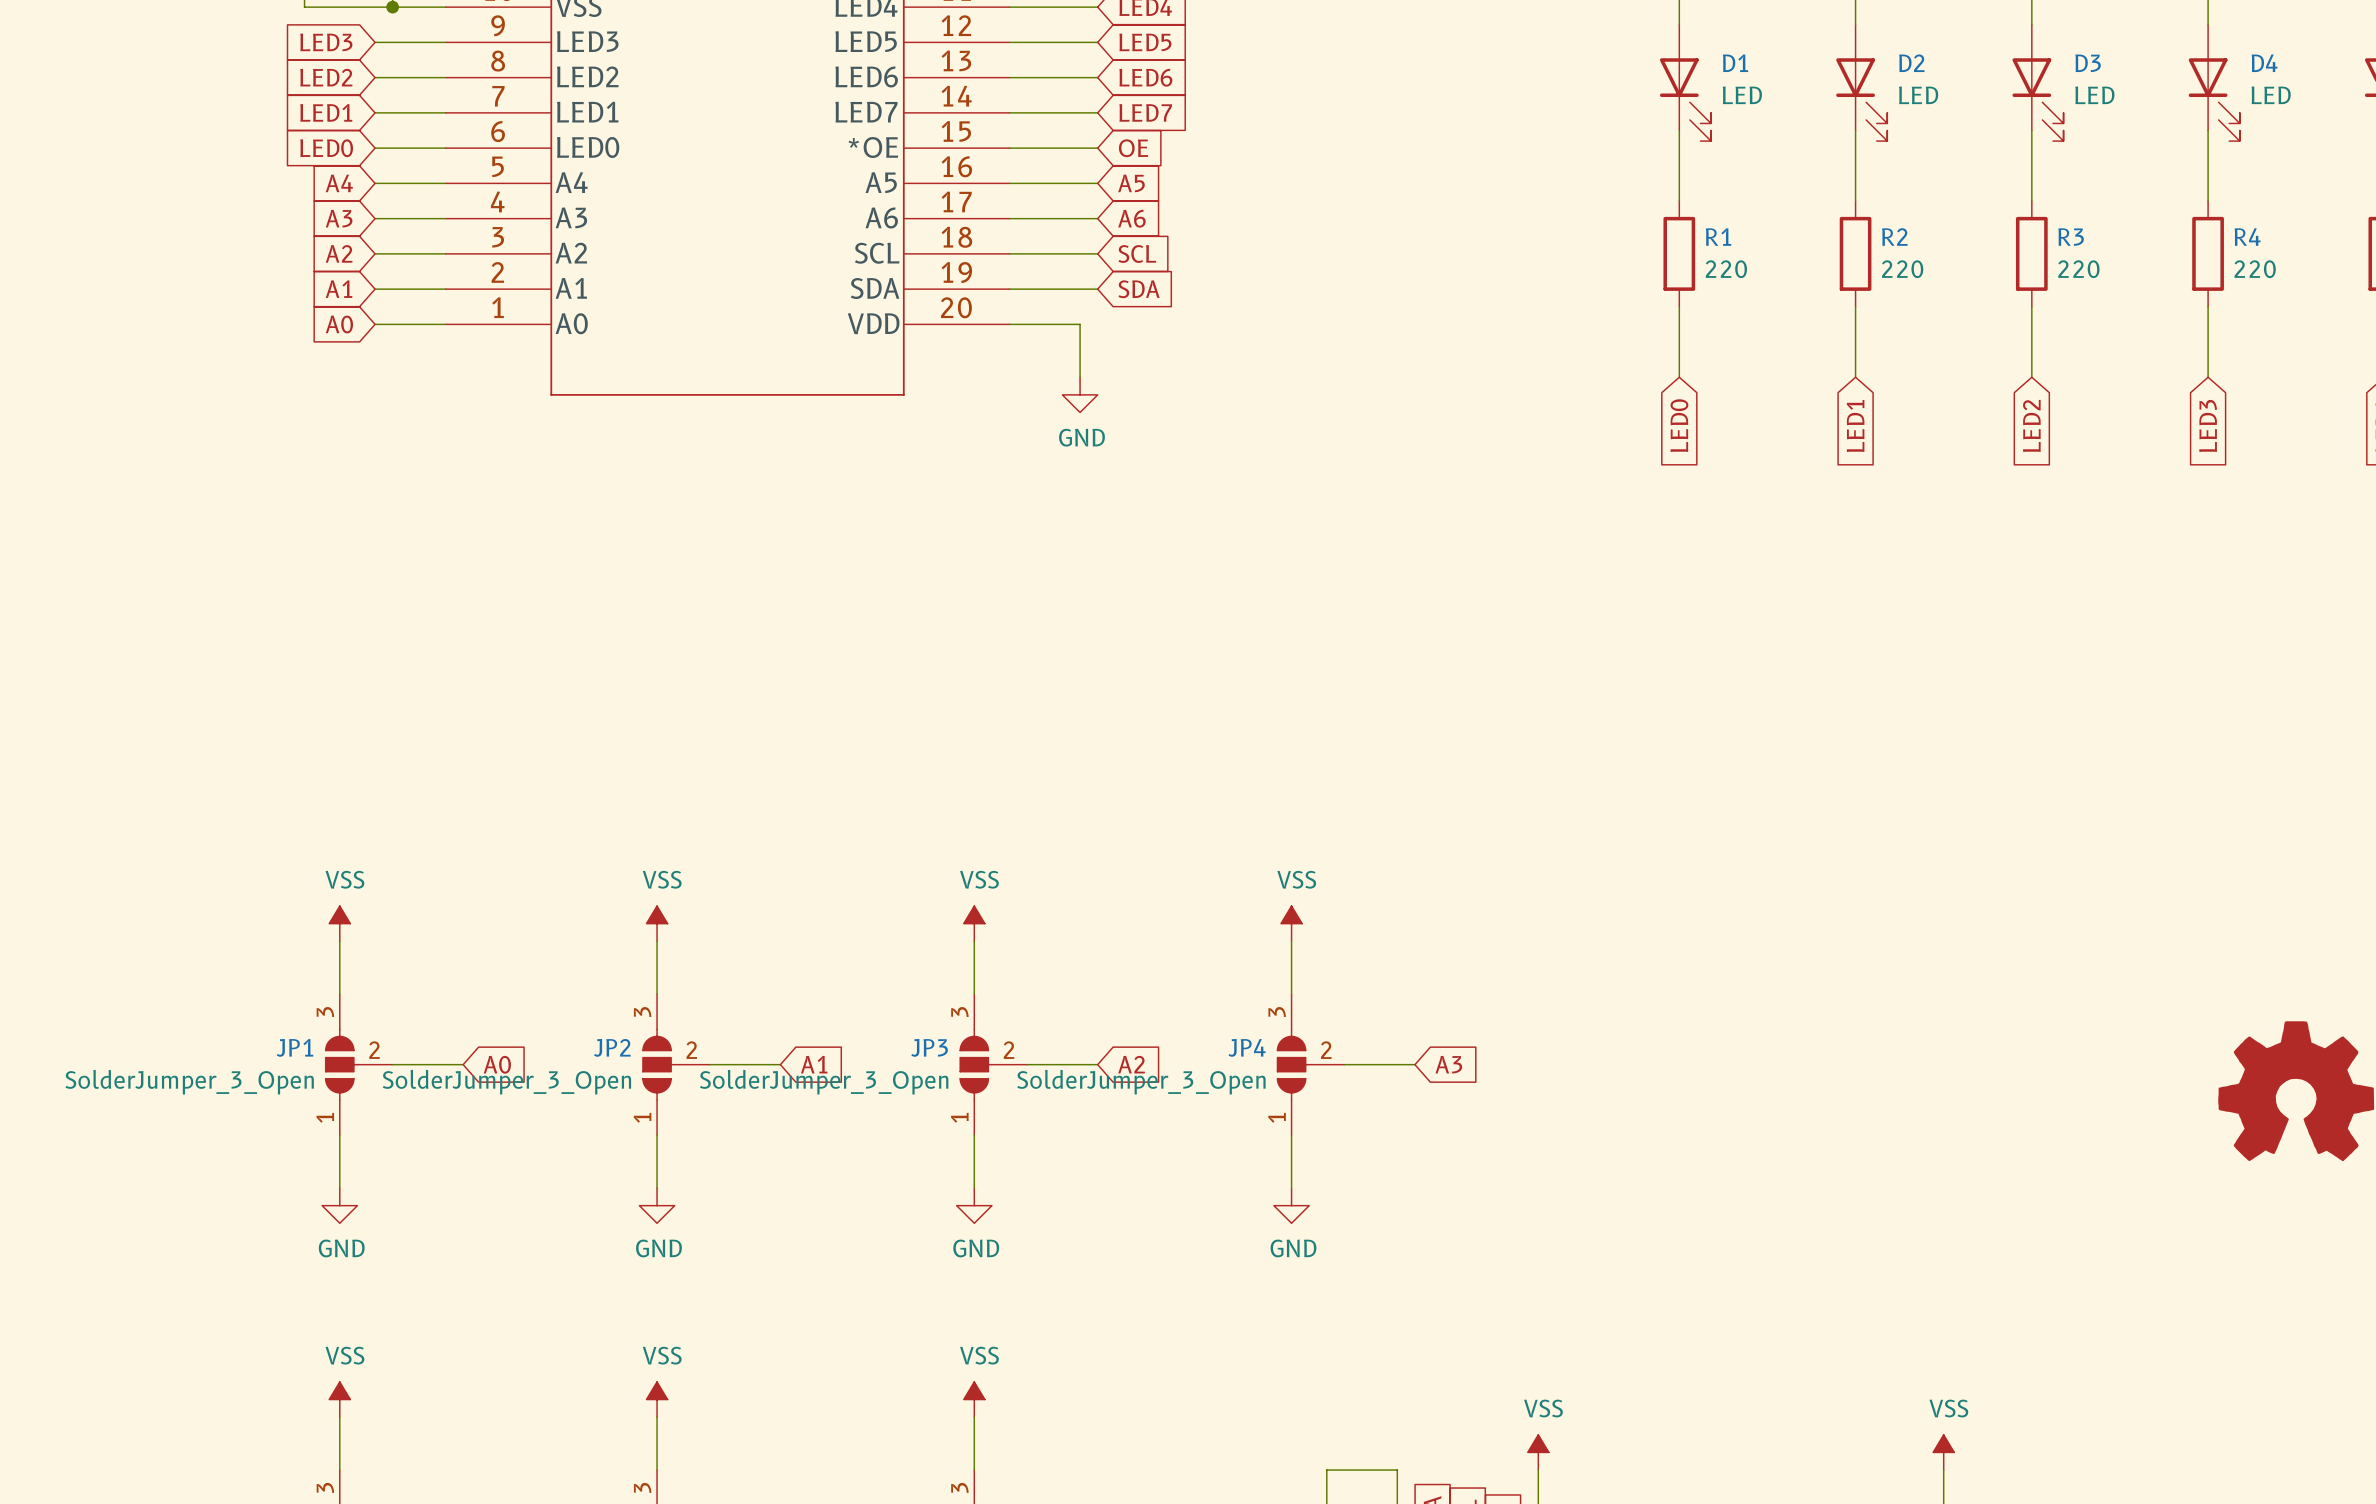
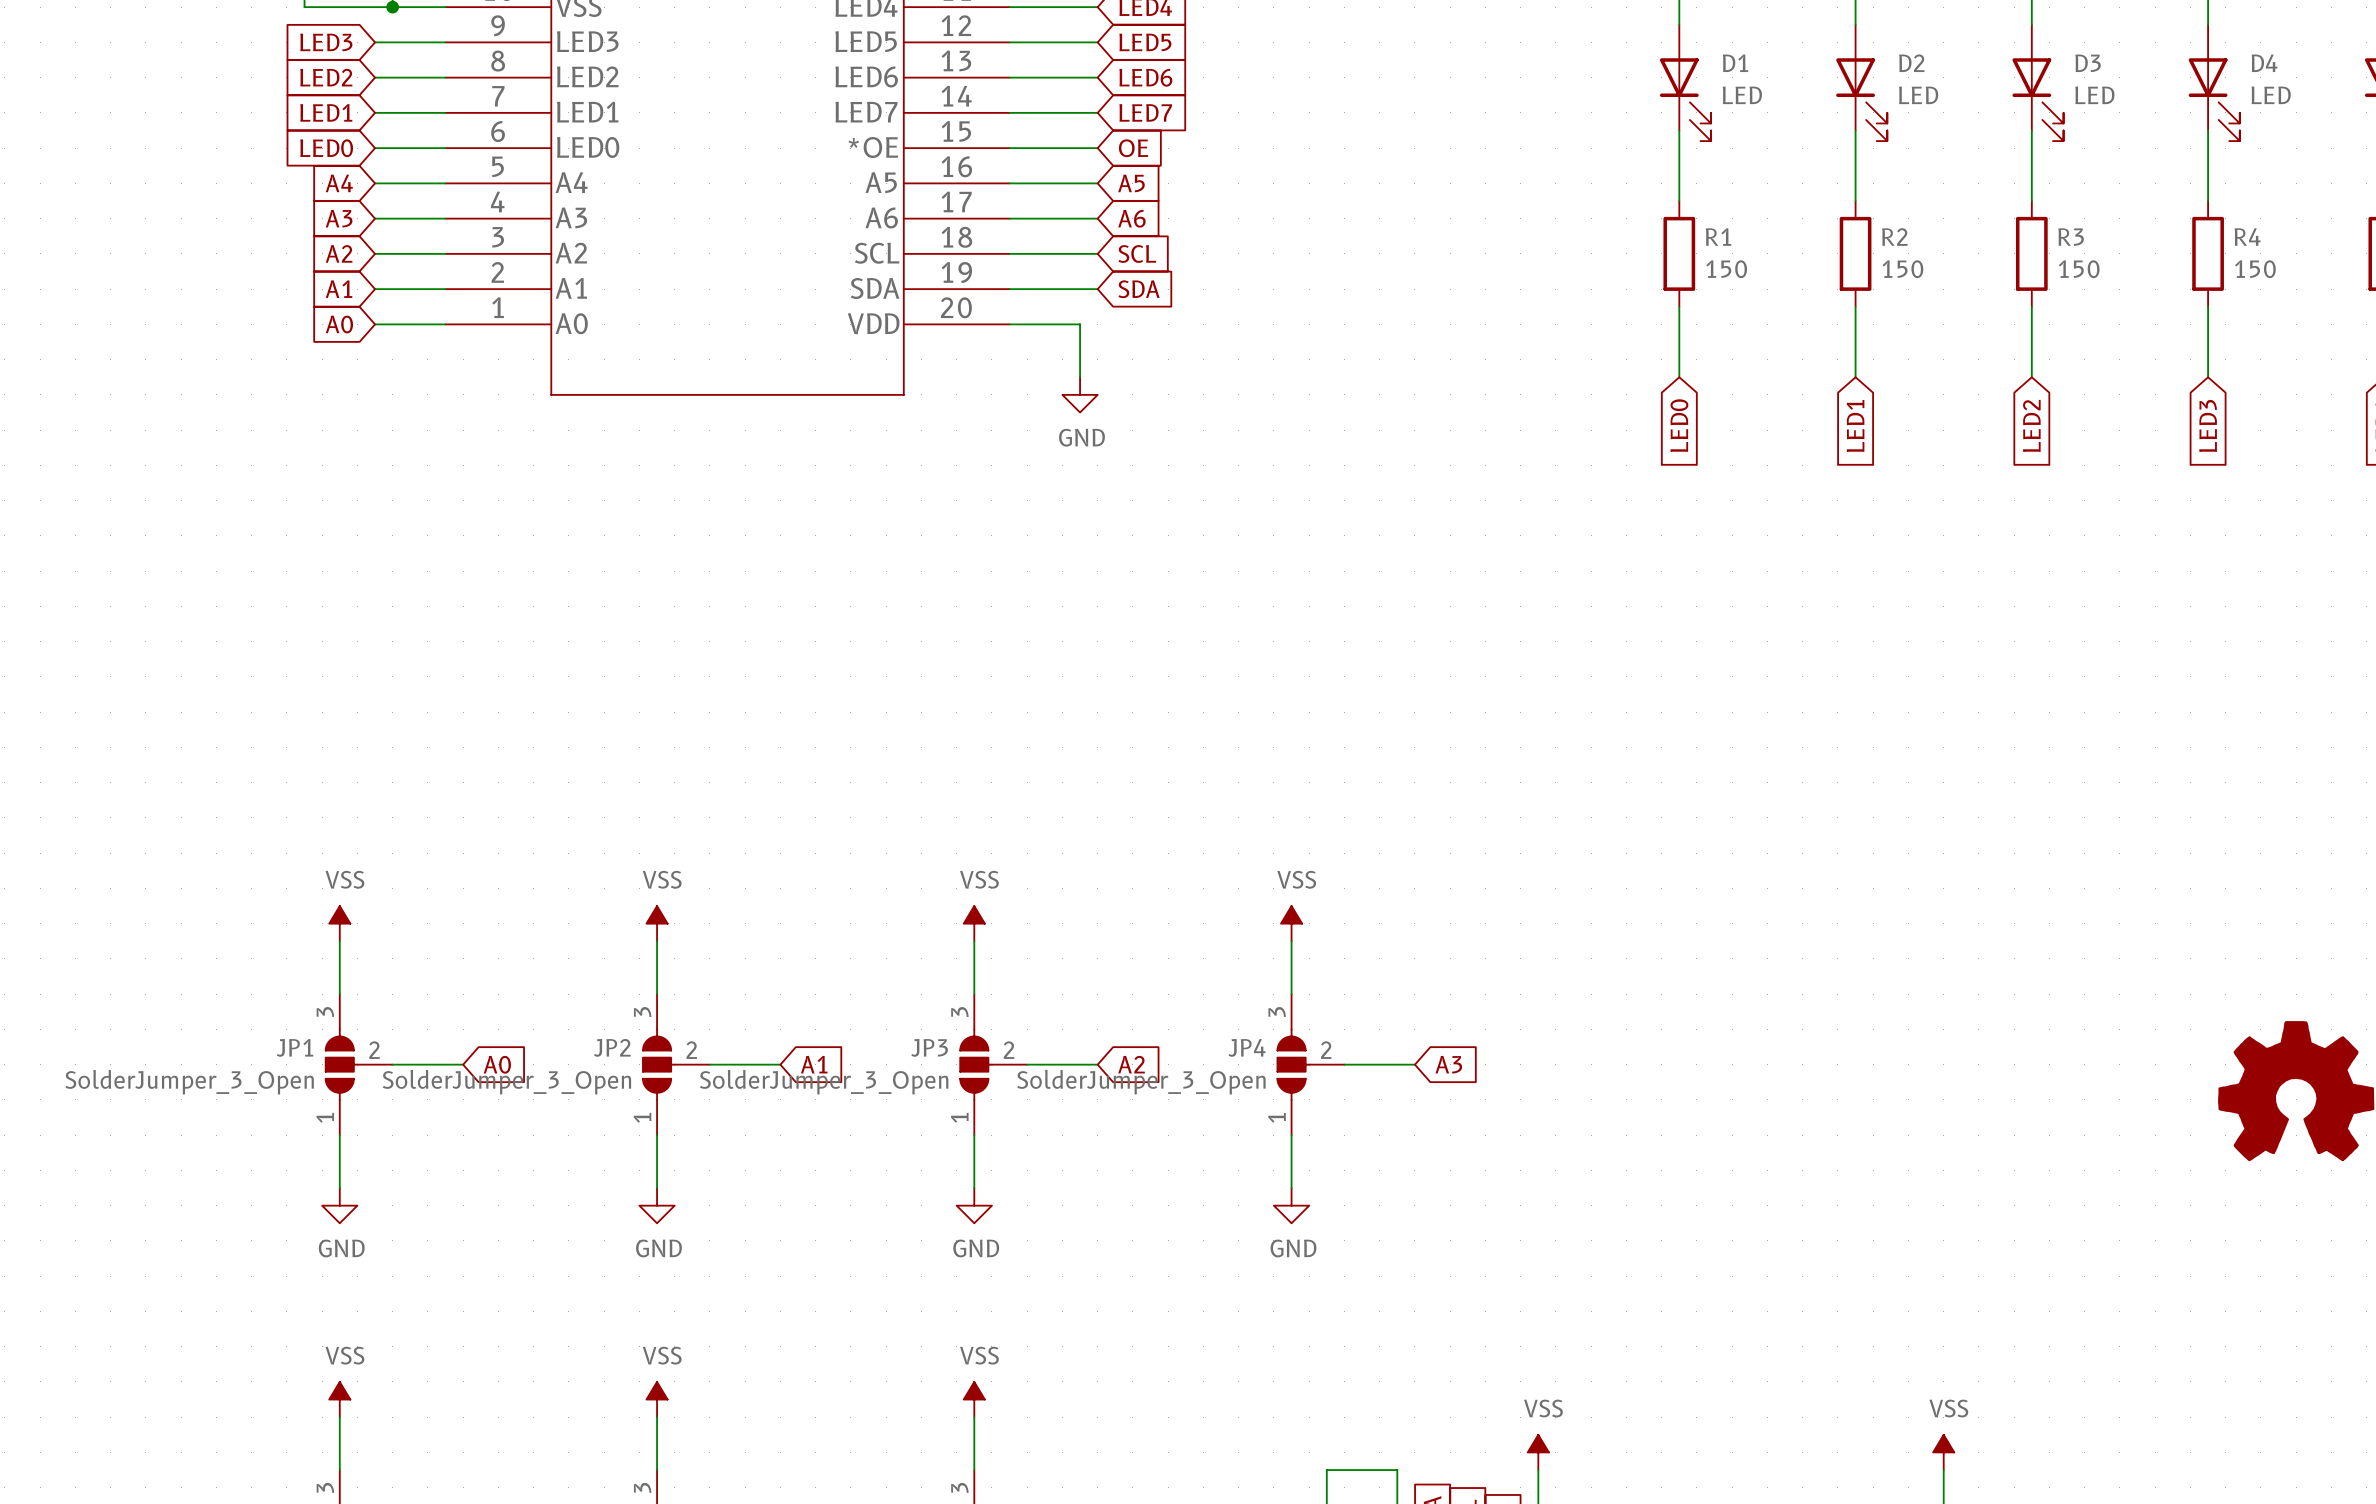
R1 value: 220 (1726, 269) -> 150 (1726, 269)
R2 value: 220 (1902, 269) -> 150 (1902, 269)
R3 value: 220 (2078, 269) -> 150 (2079, 269)
R4 value: 220 (2255, 269) -> 150 (2255, 269)

